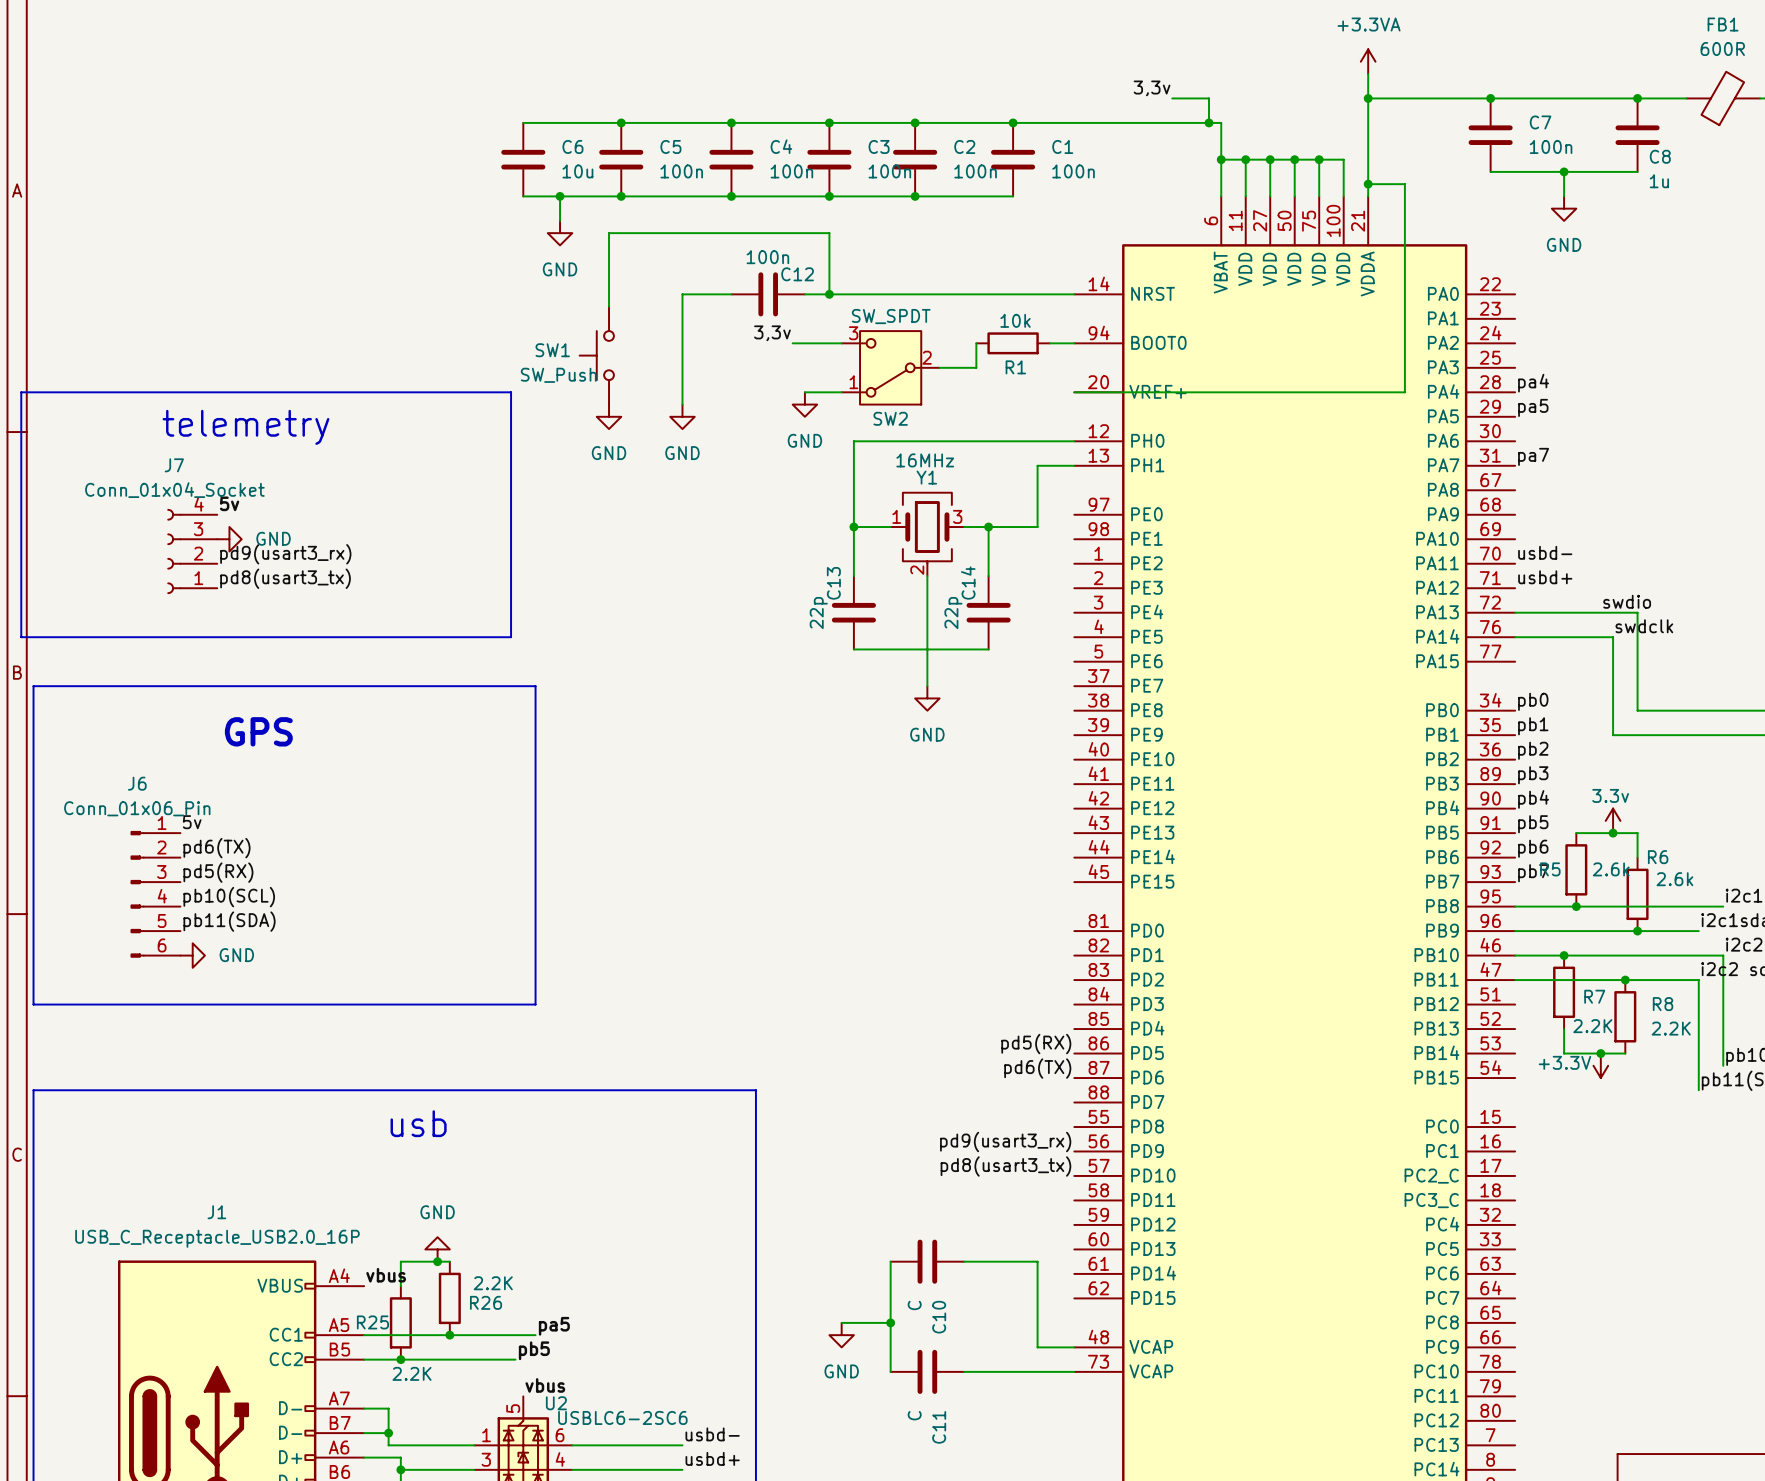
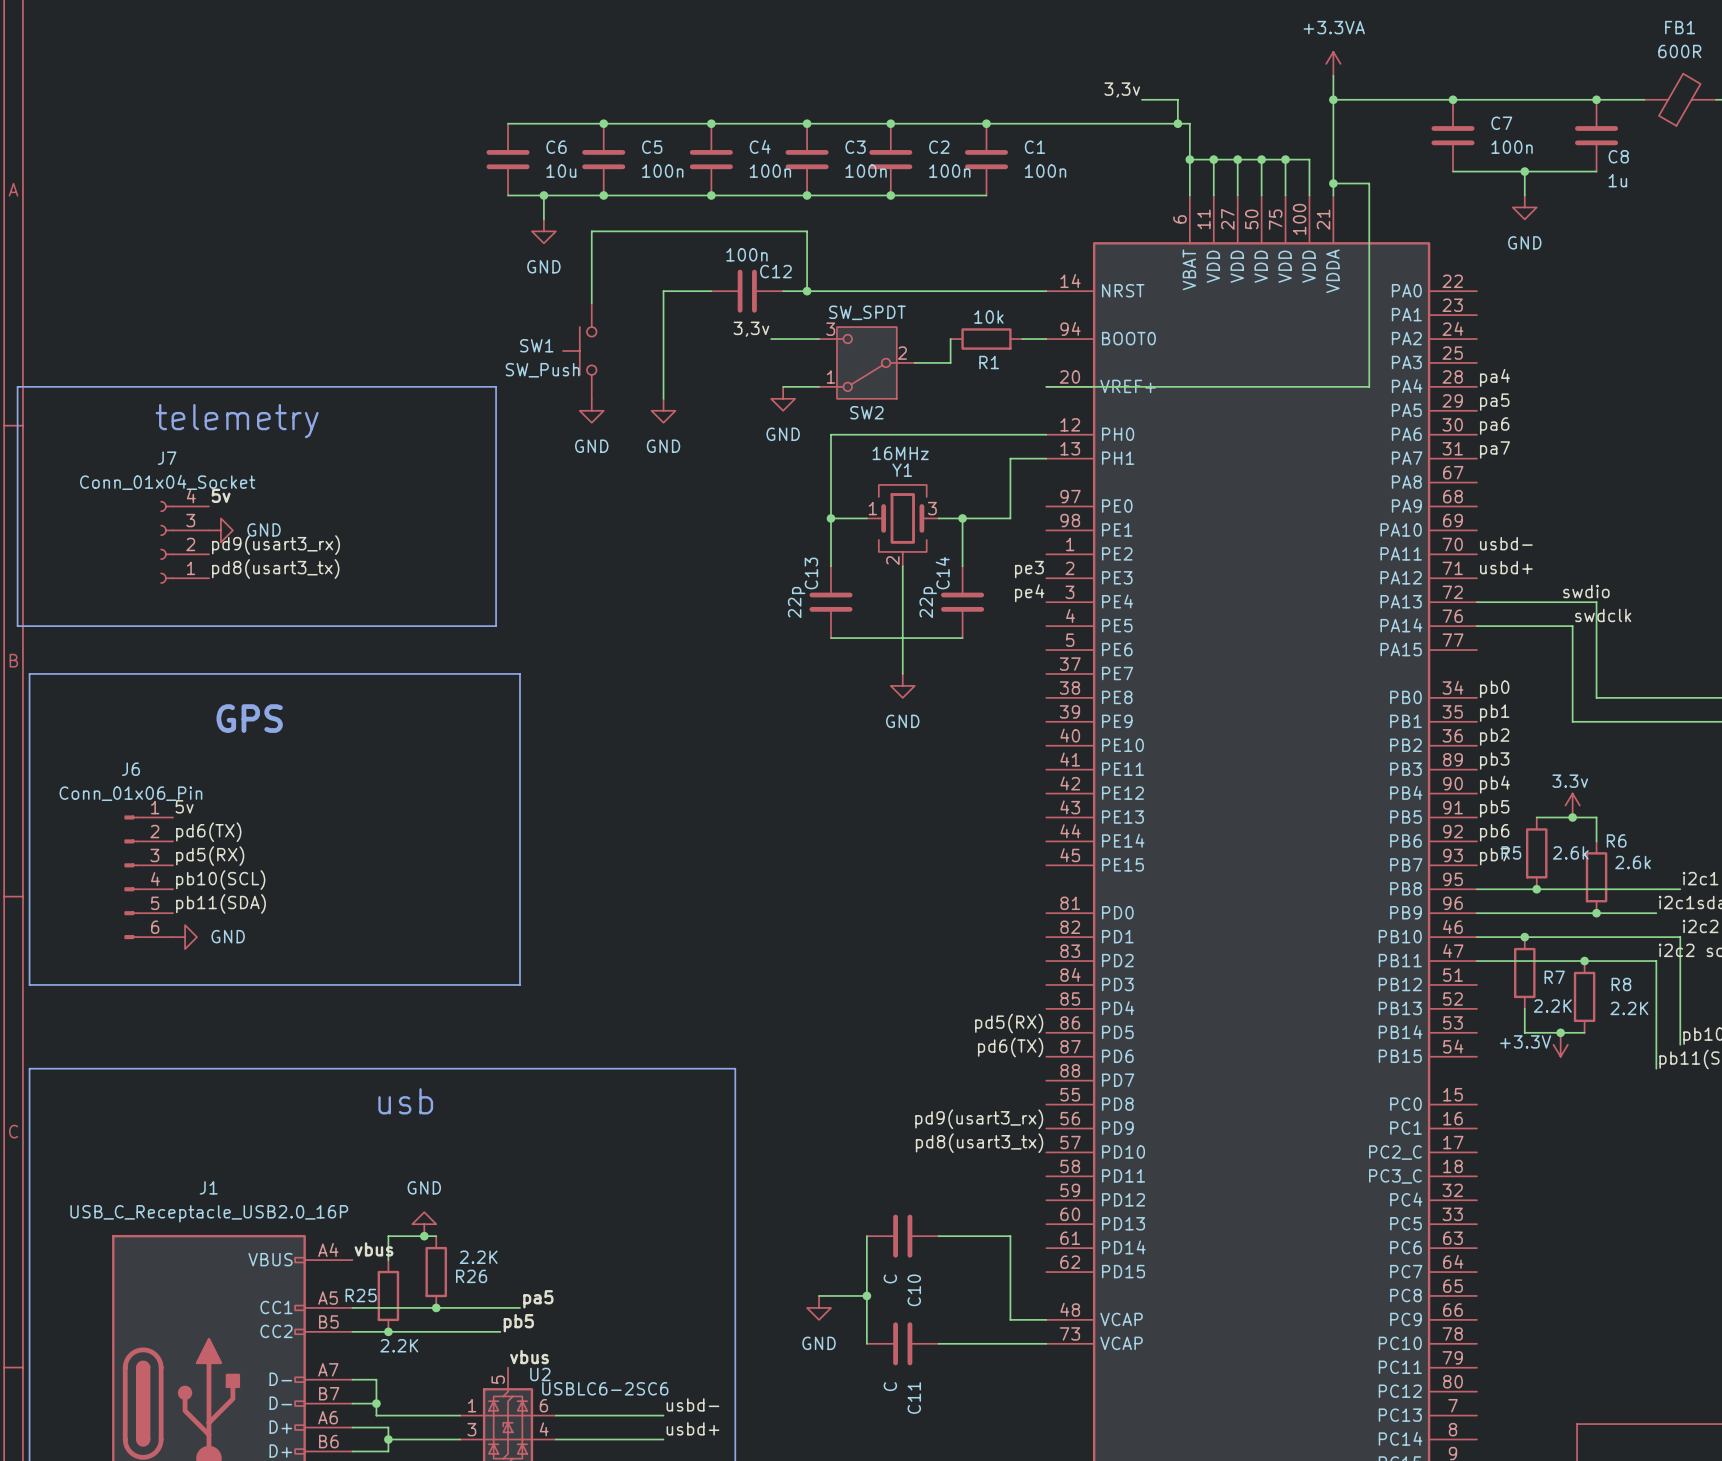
label: none -> pa6 (1494, 426)
label: none -> pe3 (1029, 569)
label: none -> pe4 (1029, 593)

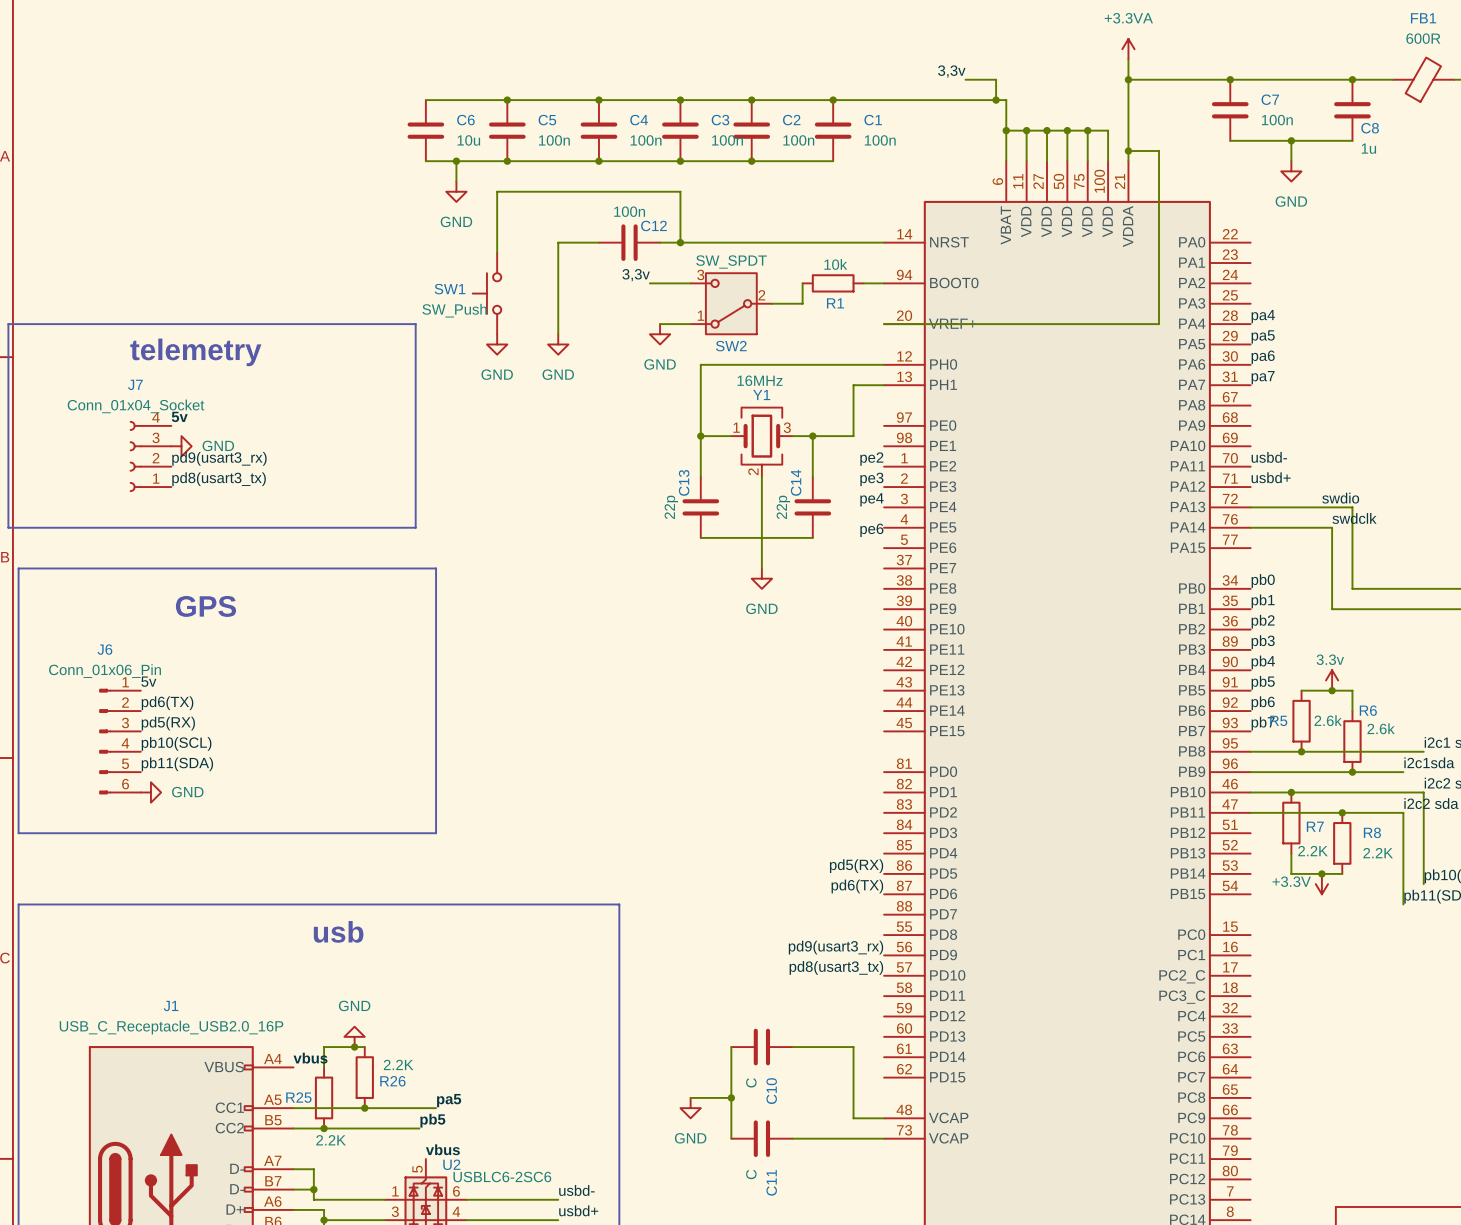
label: none -> pe2 (871, 459)
label: none -> pe6 (871, 530)

